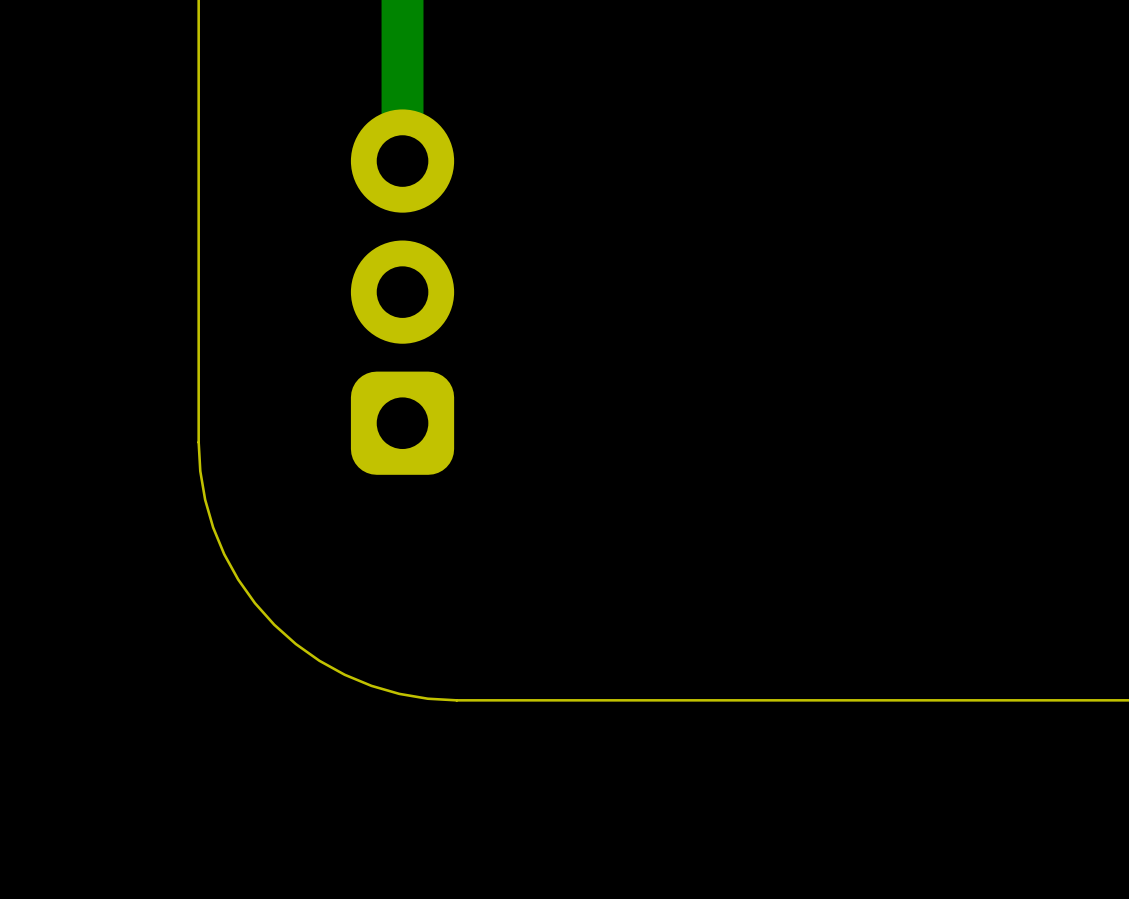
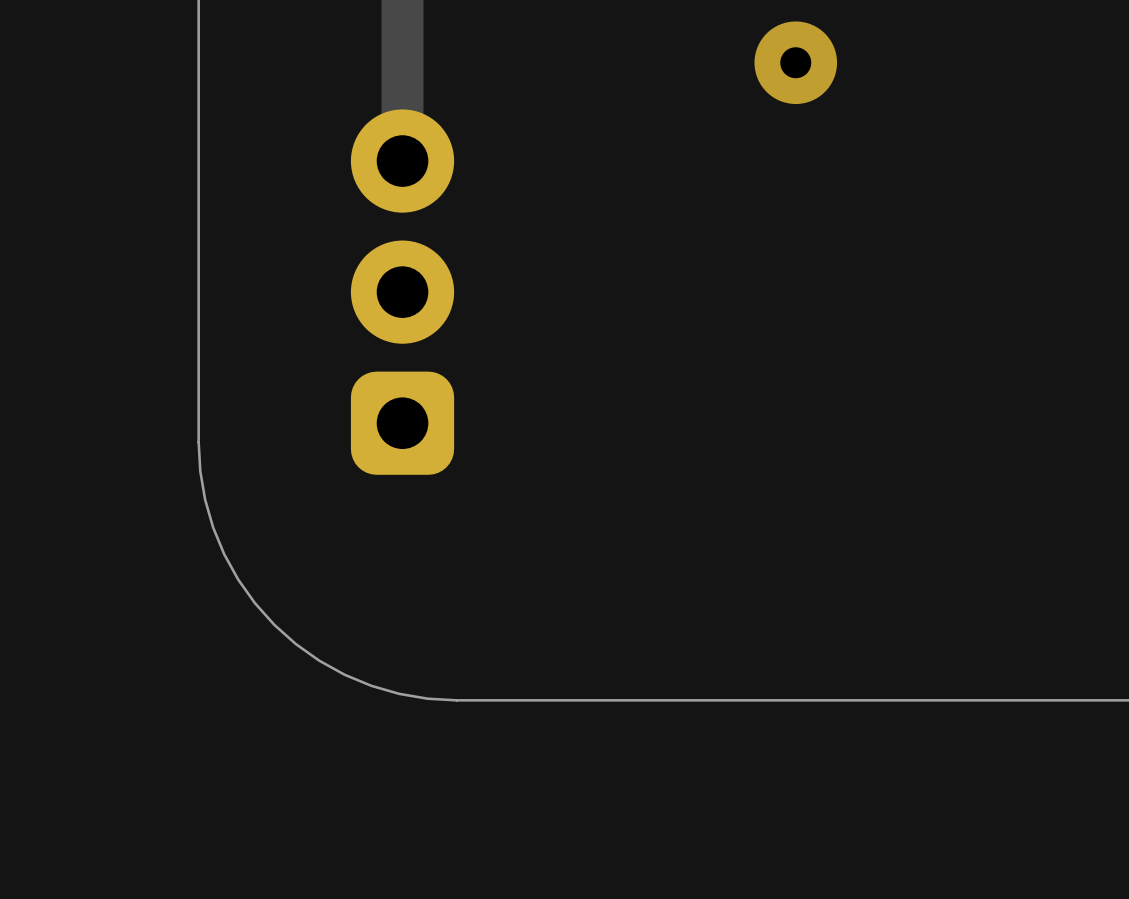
via: none -> (795, 62)

